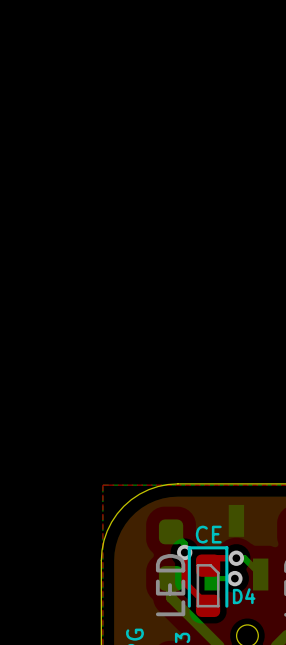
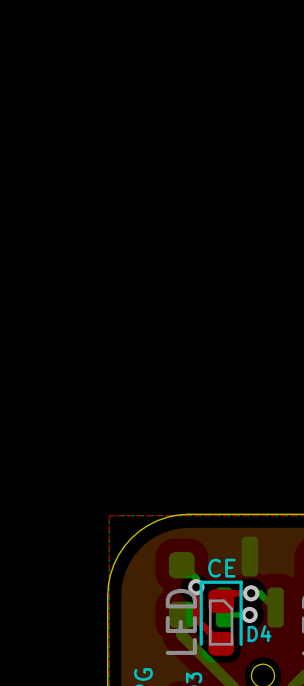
part footprint: [204, 504, 269, 591] -> [215, 536, 284, 628]

